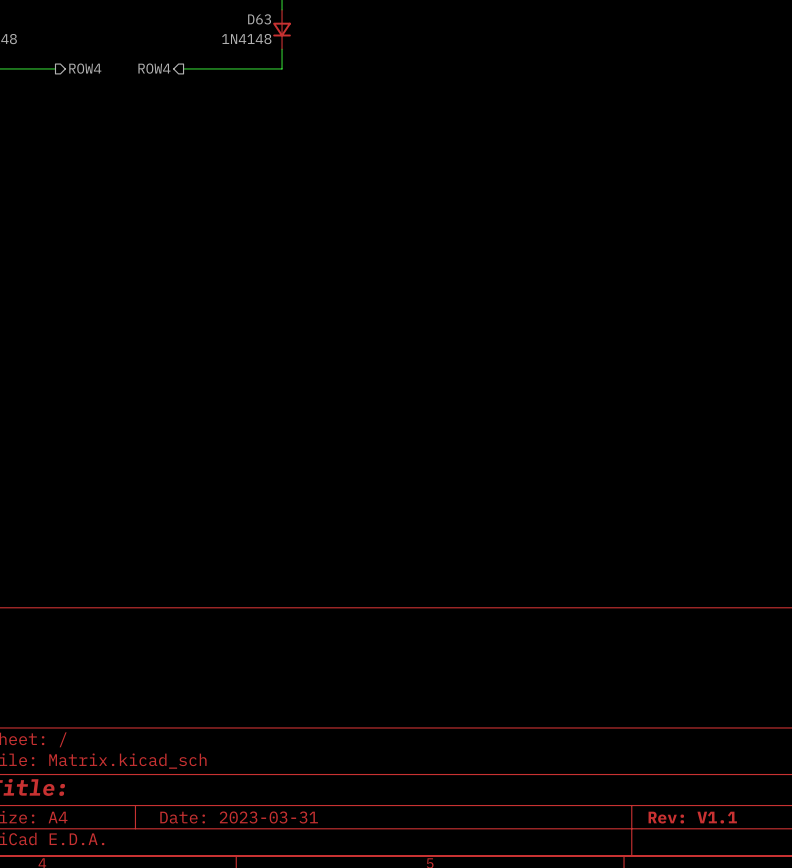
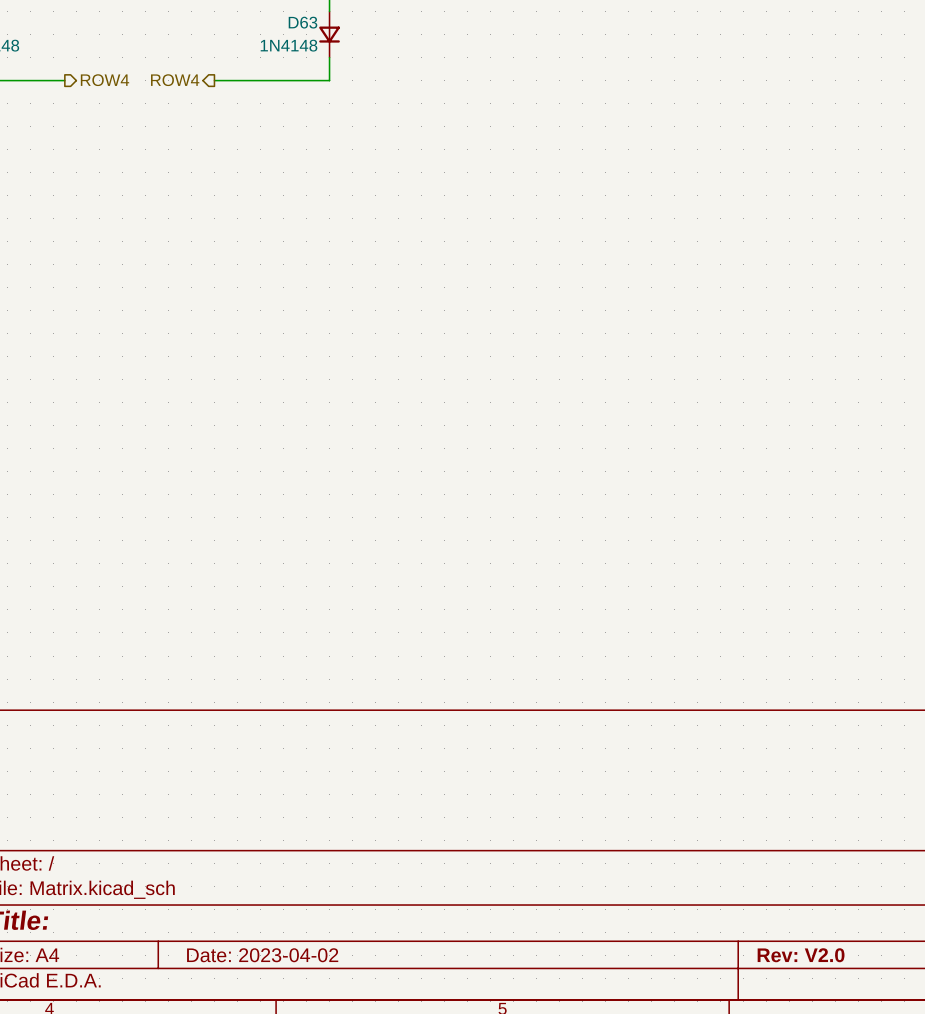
title block: Date: 2023-03-31 (239, 817) -> Date: 2023-04-02 (262, 955)
title block: Rev: V1.1 (692, 817) -> Rev: V2.0 (801, 955)

